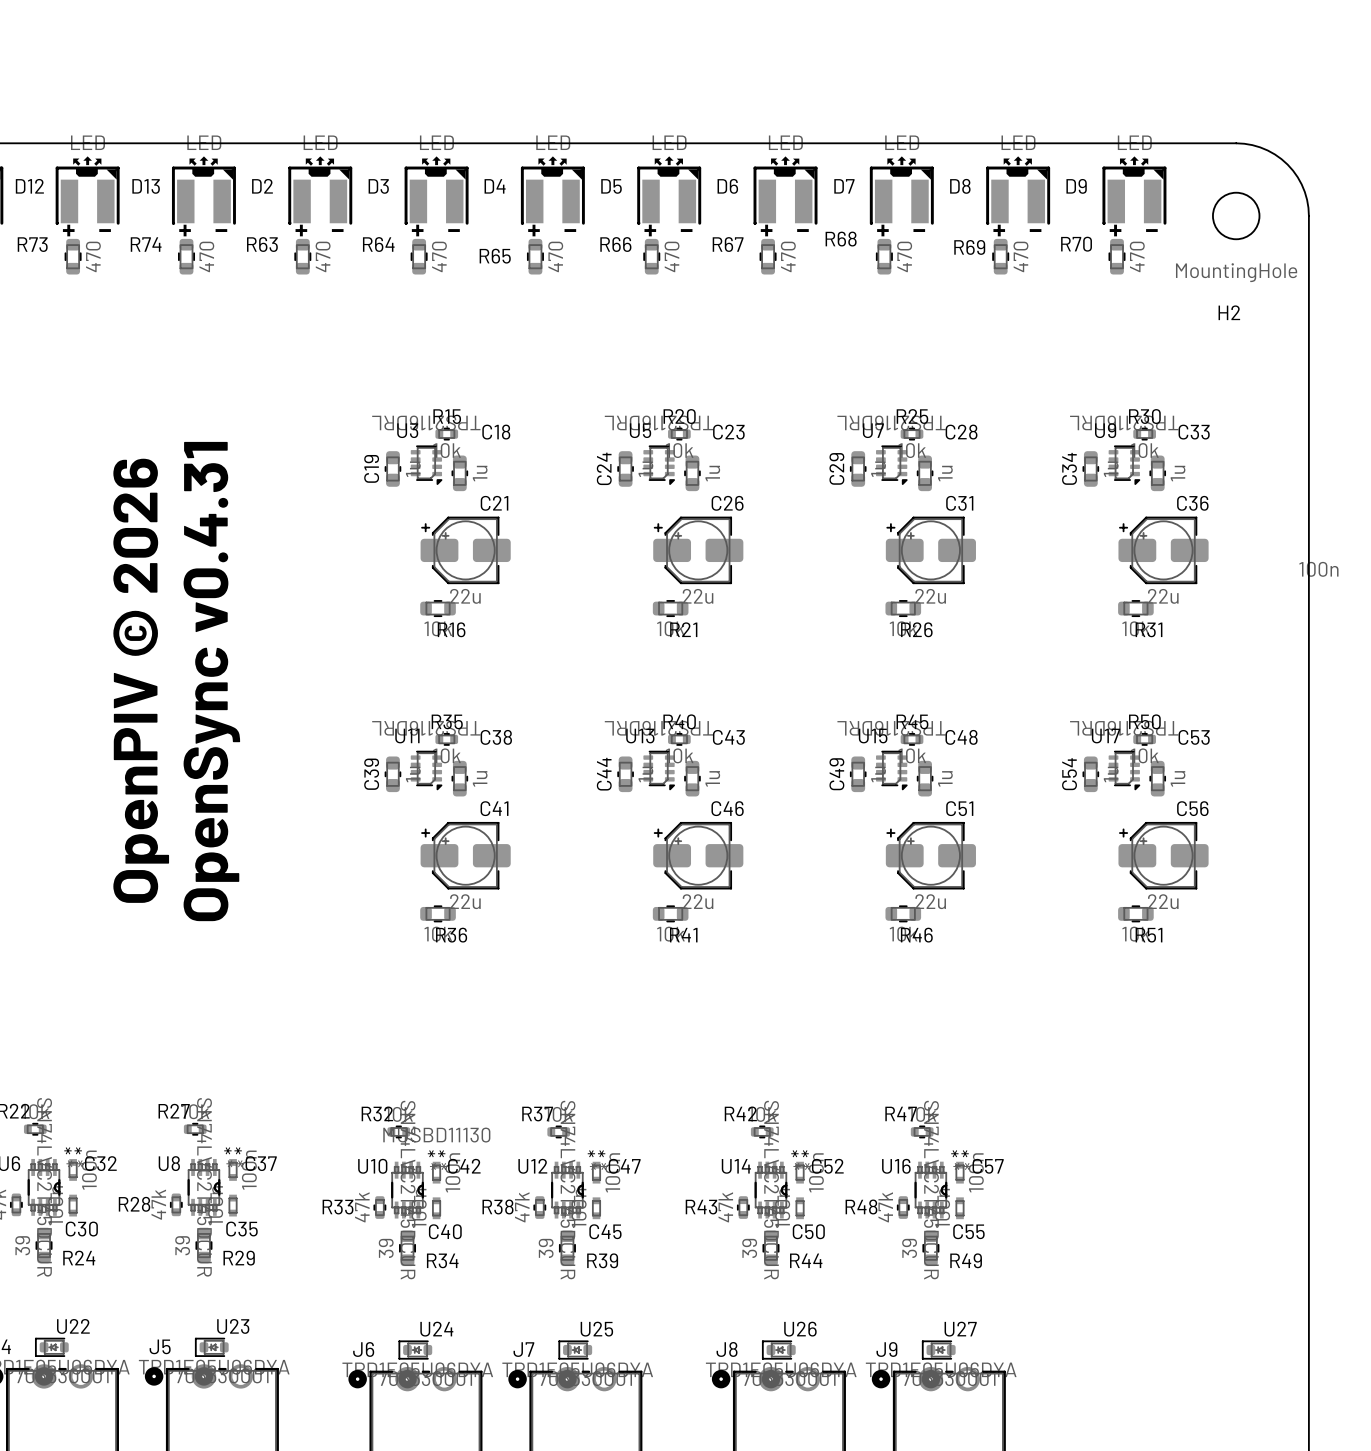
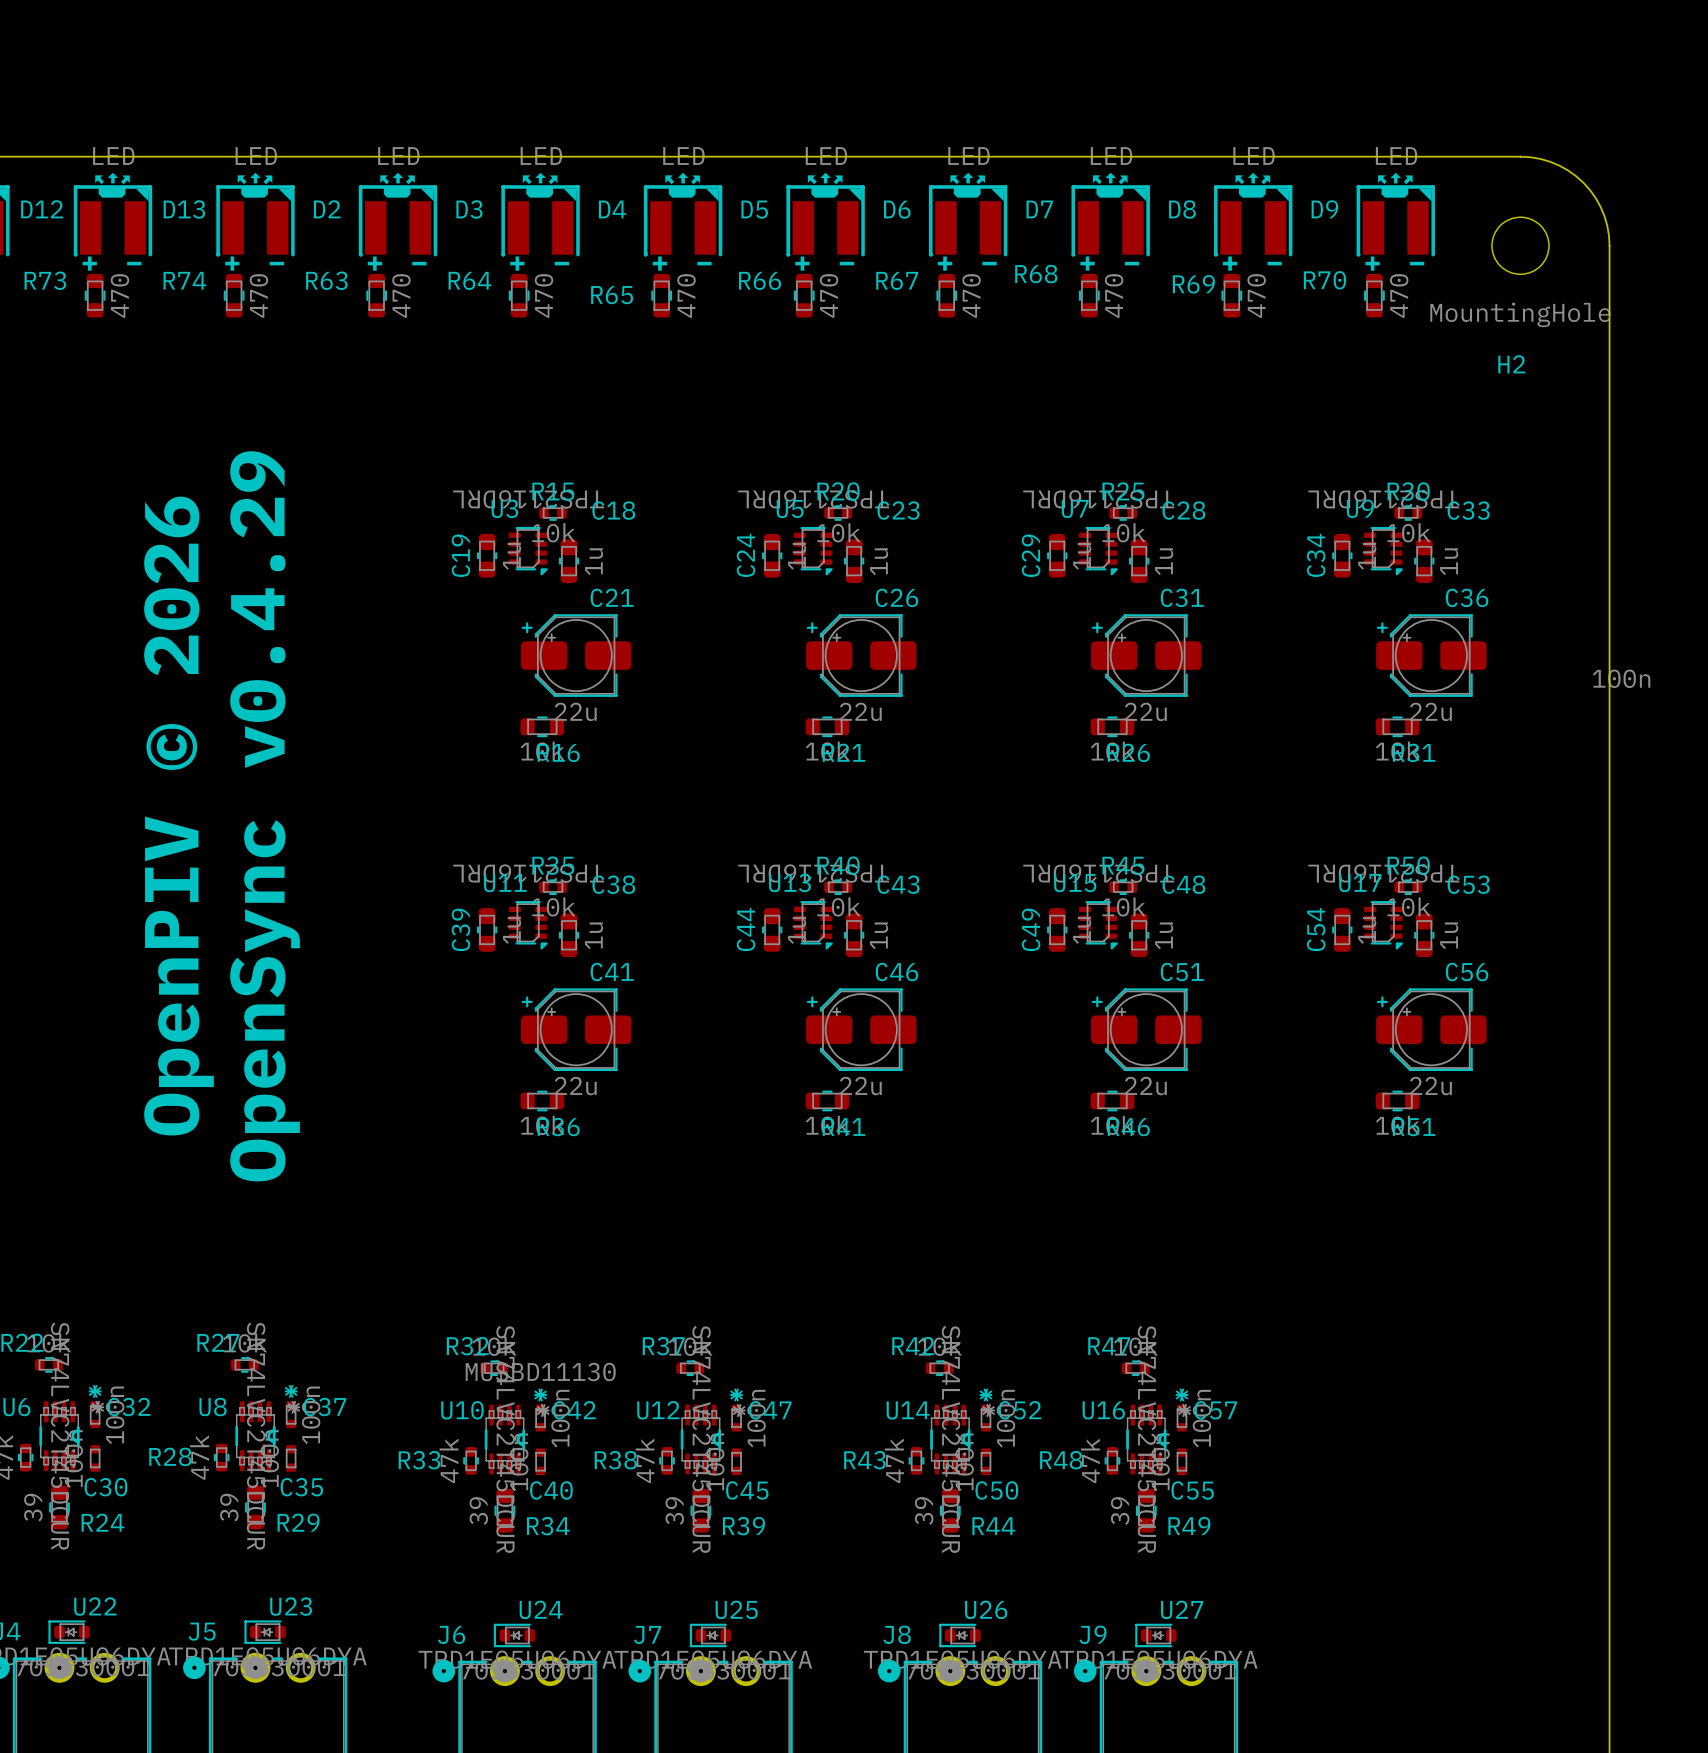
text: OpenSync v0.4.31 (211, 681) -> OpenSync v0.4.29 (265, 816)

